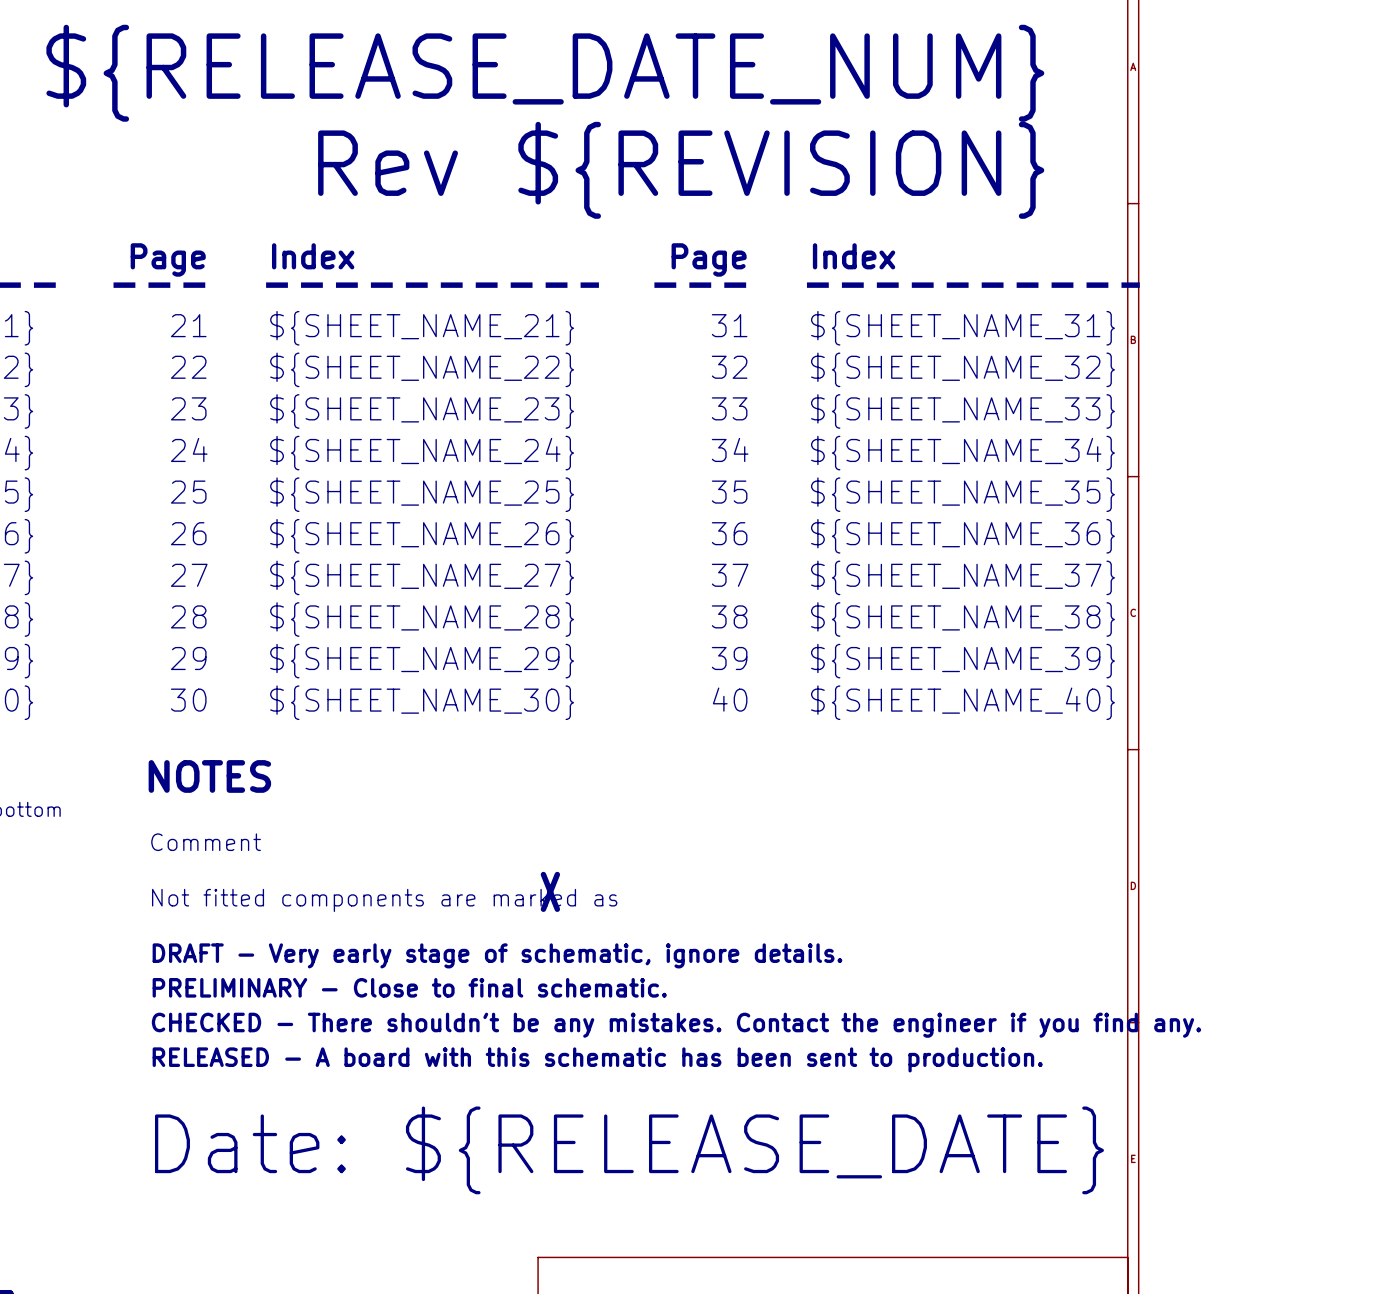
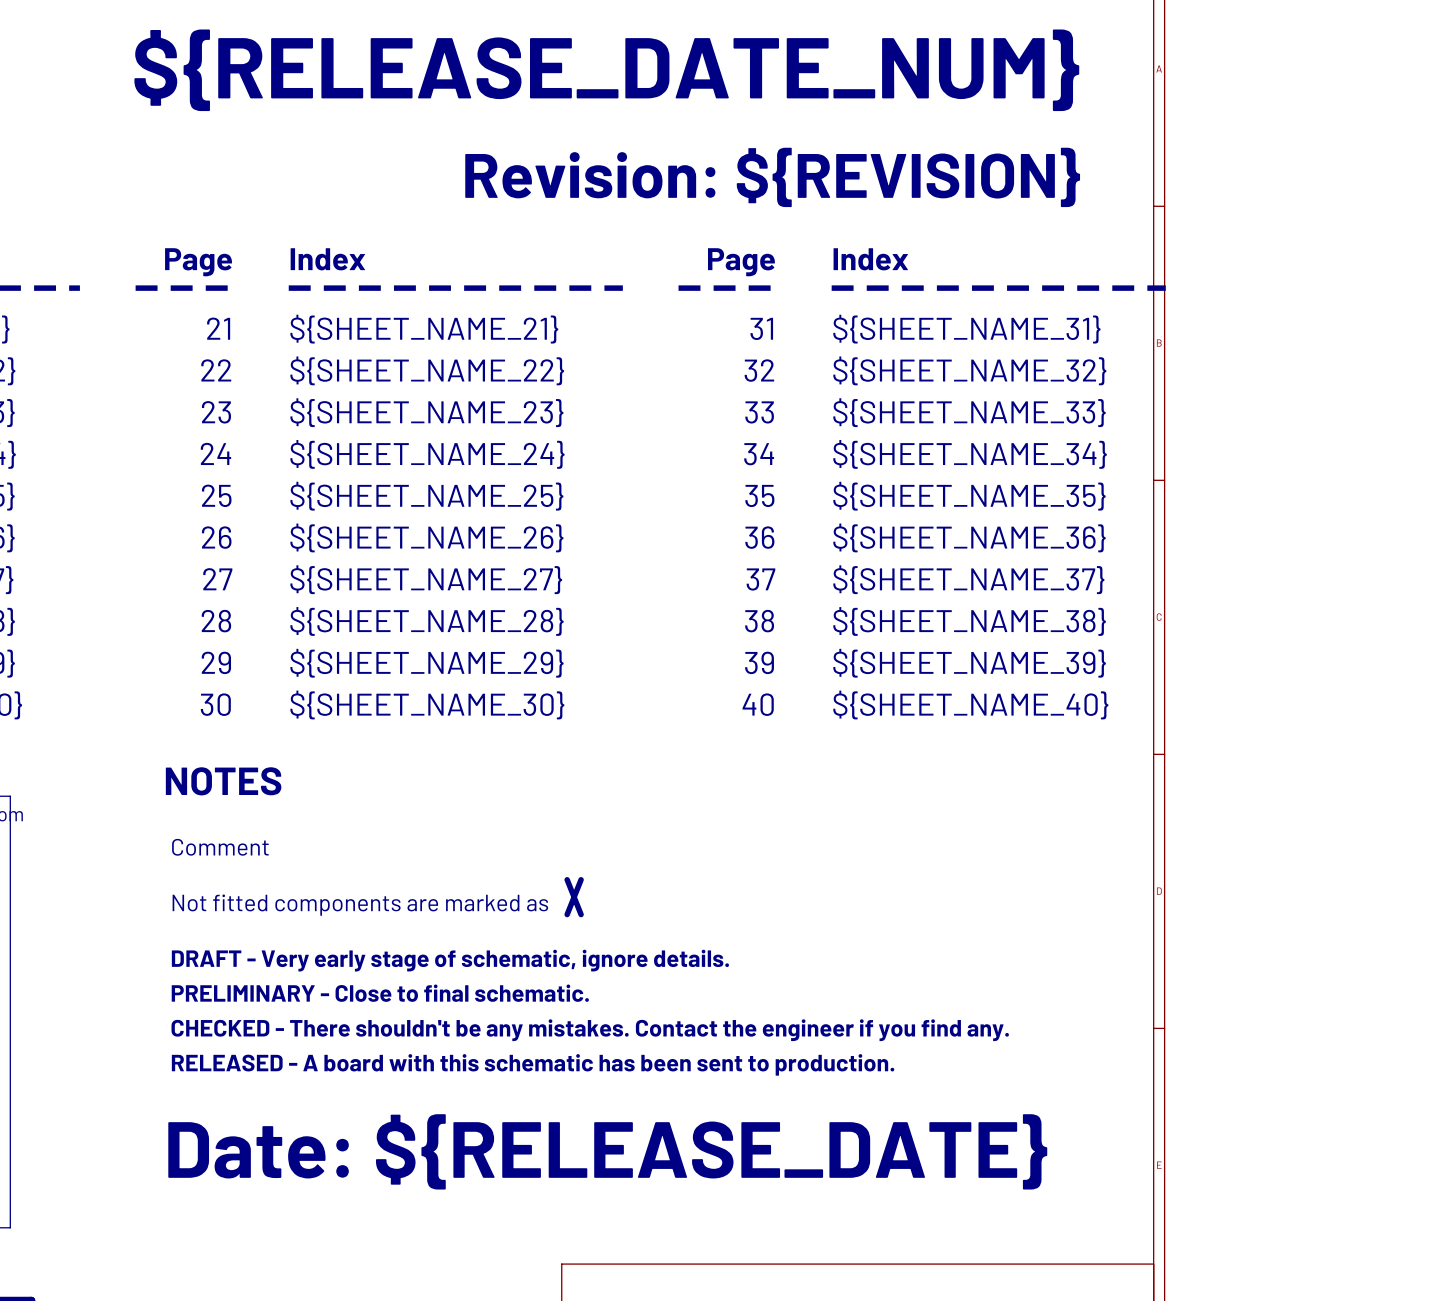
text: Rev ${REVISION} (681, 170) -> Revision: ${REVISION} (772, 177)

